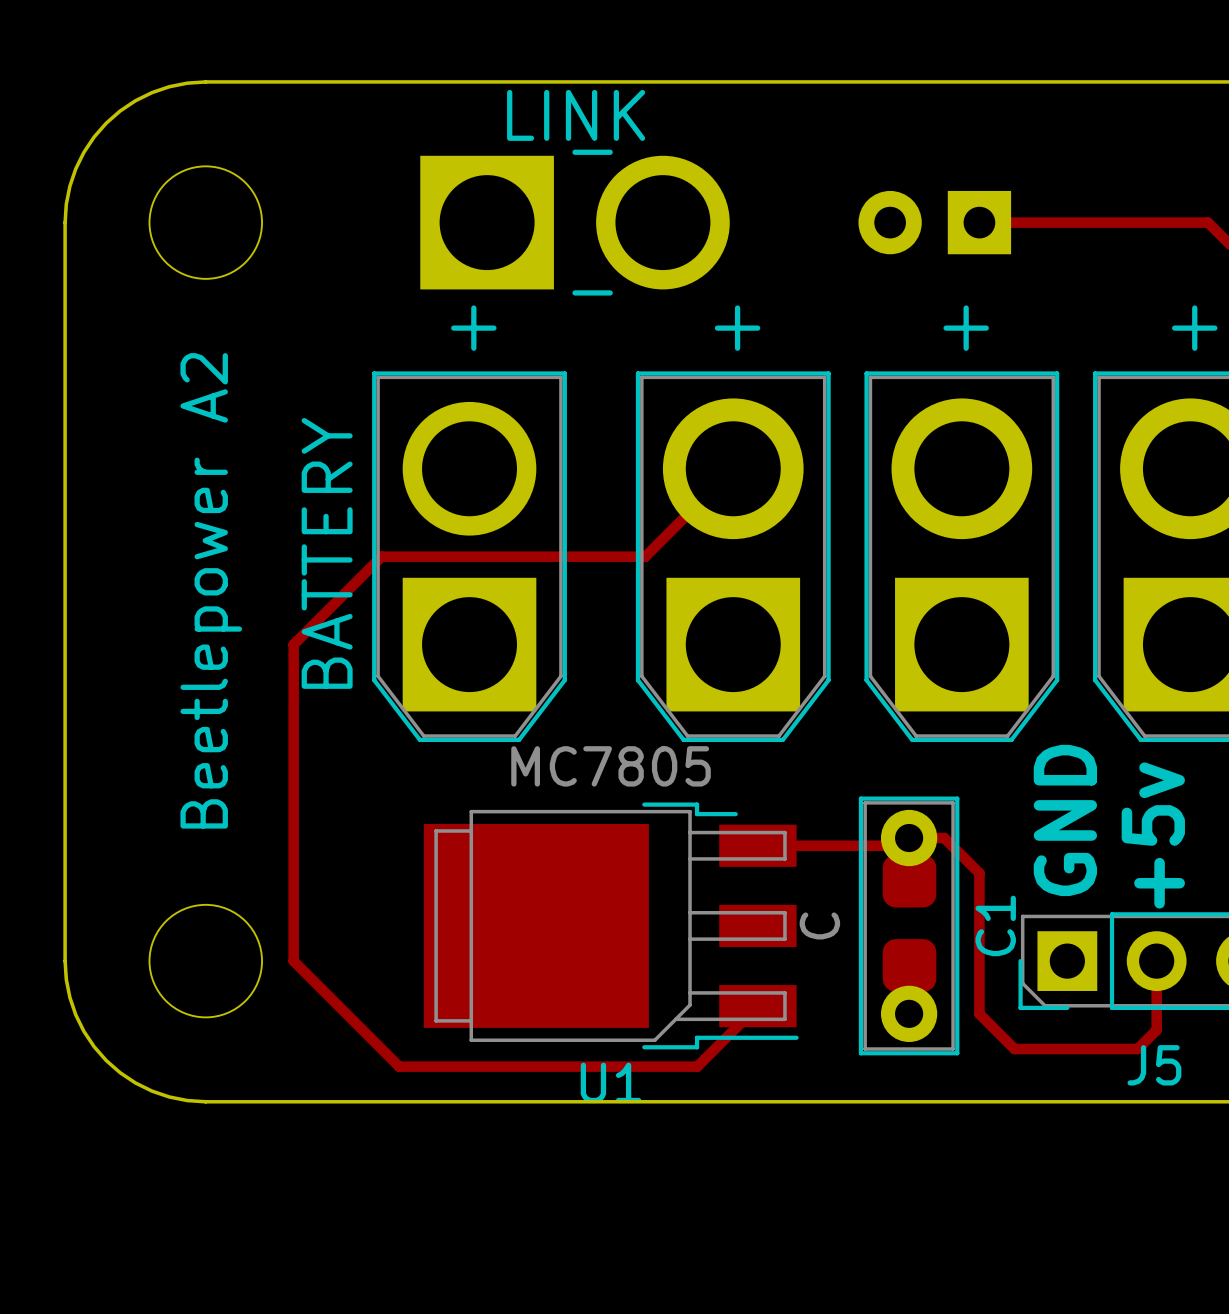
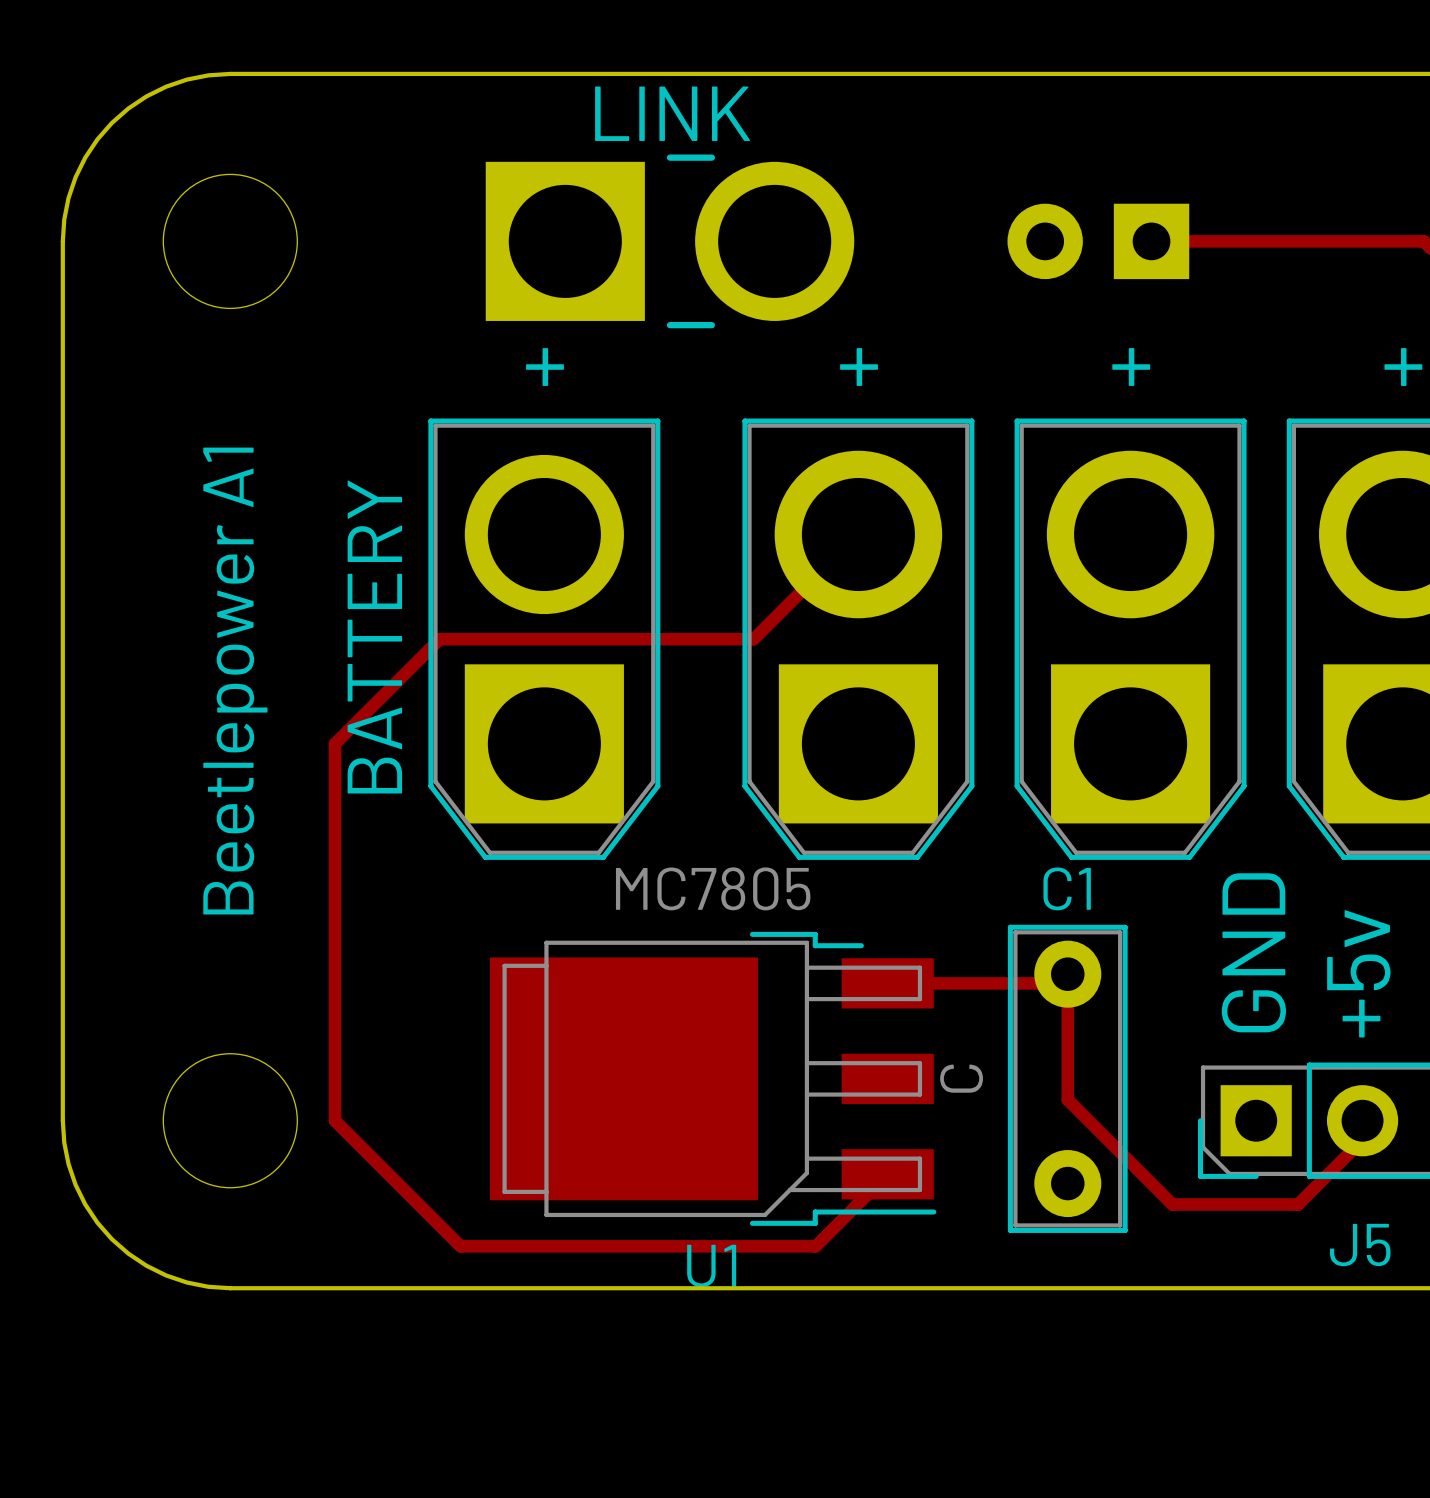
text: Beetlepower A2 (211, 590) -> Beetlepower A1 (235, 681)
C1 footprint: [858, 796, 960, 1056] -> [1007, 924, 1128, 1233]
top track: (909, 838) (944, 838) (979, 873) (979, 1013) -> (1067, 974) (1067, 1099) (1151, 1183)
C1 name position: C1 (995, 925) -> C1 (1067, 888)
top track: (1156, 977) (1156, 1030) (1137, 1049) (1014, 1049) (997, 1031) -> (1362, 1140) (1298, 1204) (1172, 1204)

